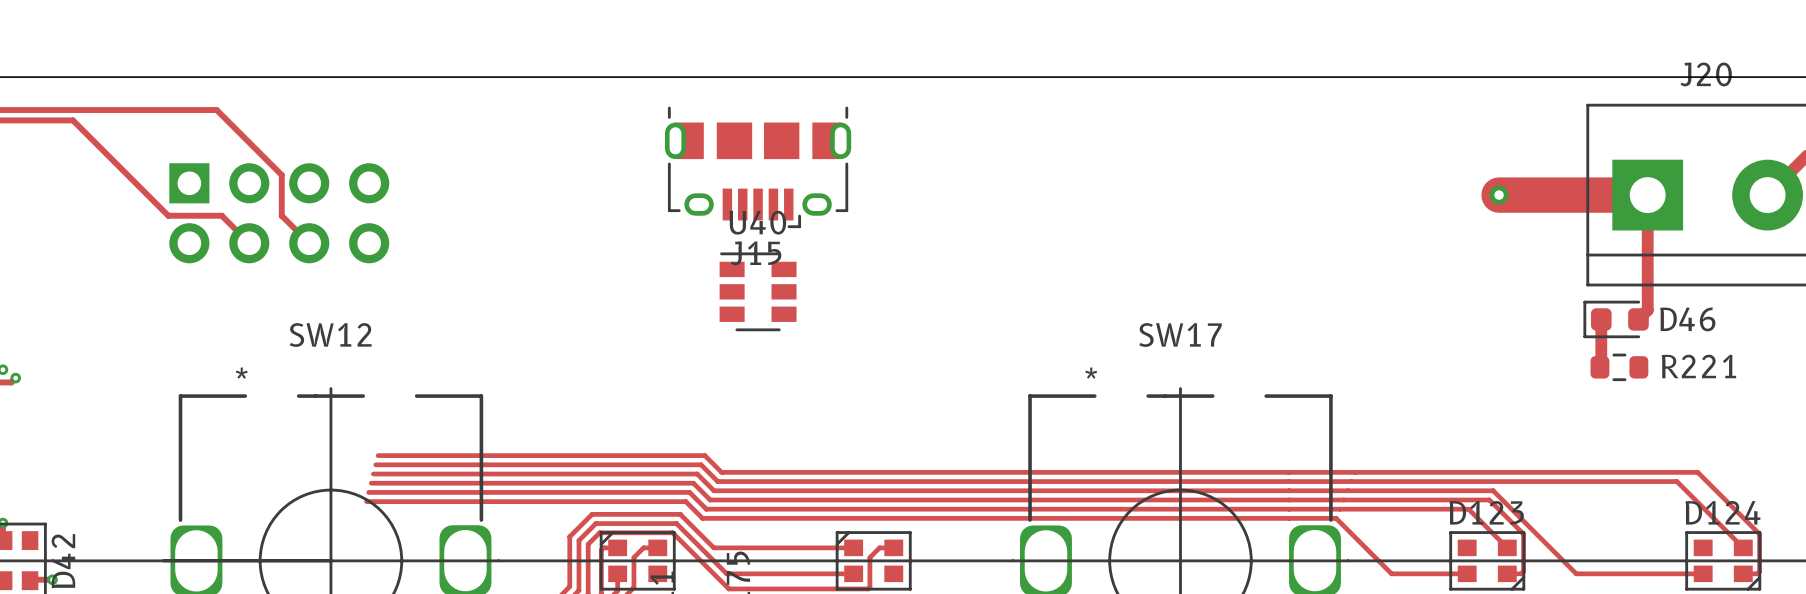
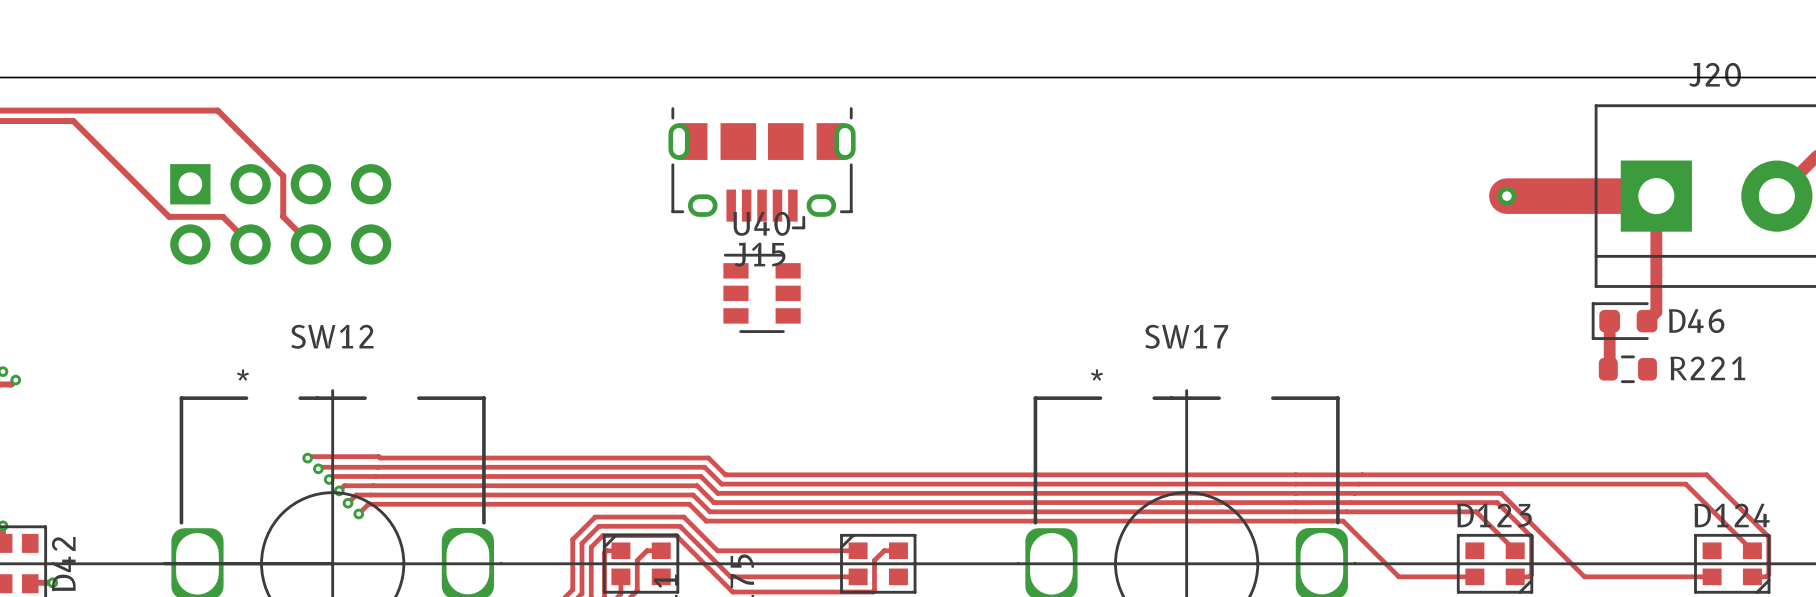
track: none -> (307, 458) (380, 457)
via: none -> (307, 458)
track: none -> (377, 467) (319, 467) (318, 468)
via: none -> (318, 468)
track: none -> (375, 476) (332, 476) (329, 479)
via: none -> (329, 479)
track: none -> (373, 485) (344, 485) (339, 490)
via: none -> (339, 490)
track: none -> (370, 495) (356, 495) (348, 503)
via: none -> (348, 503)
track: none -> (368, 504) (358, 513)
via: none -> (358, 513)

